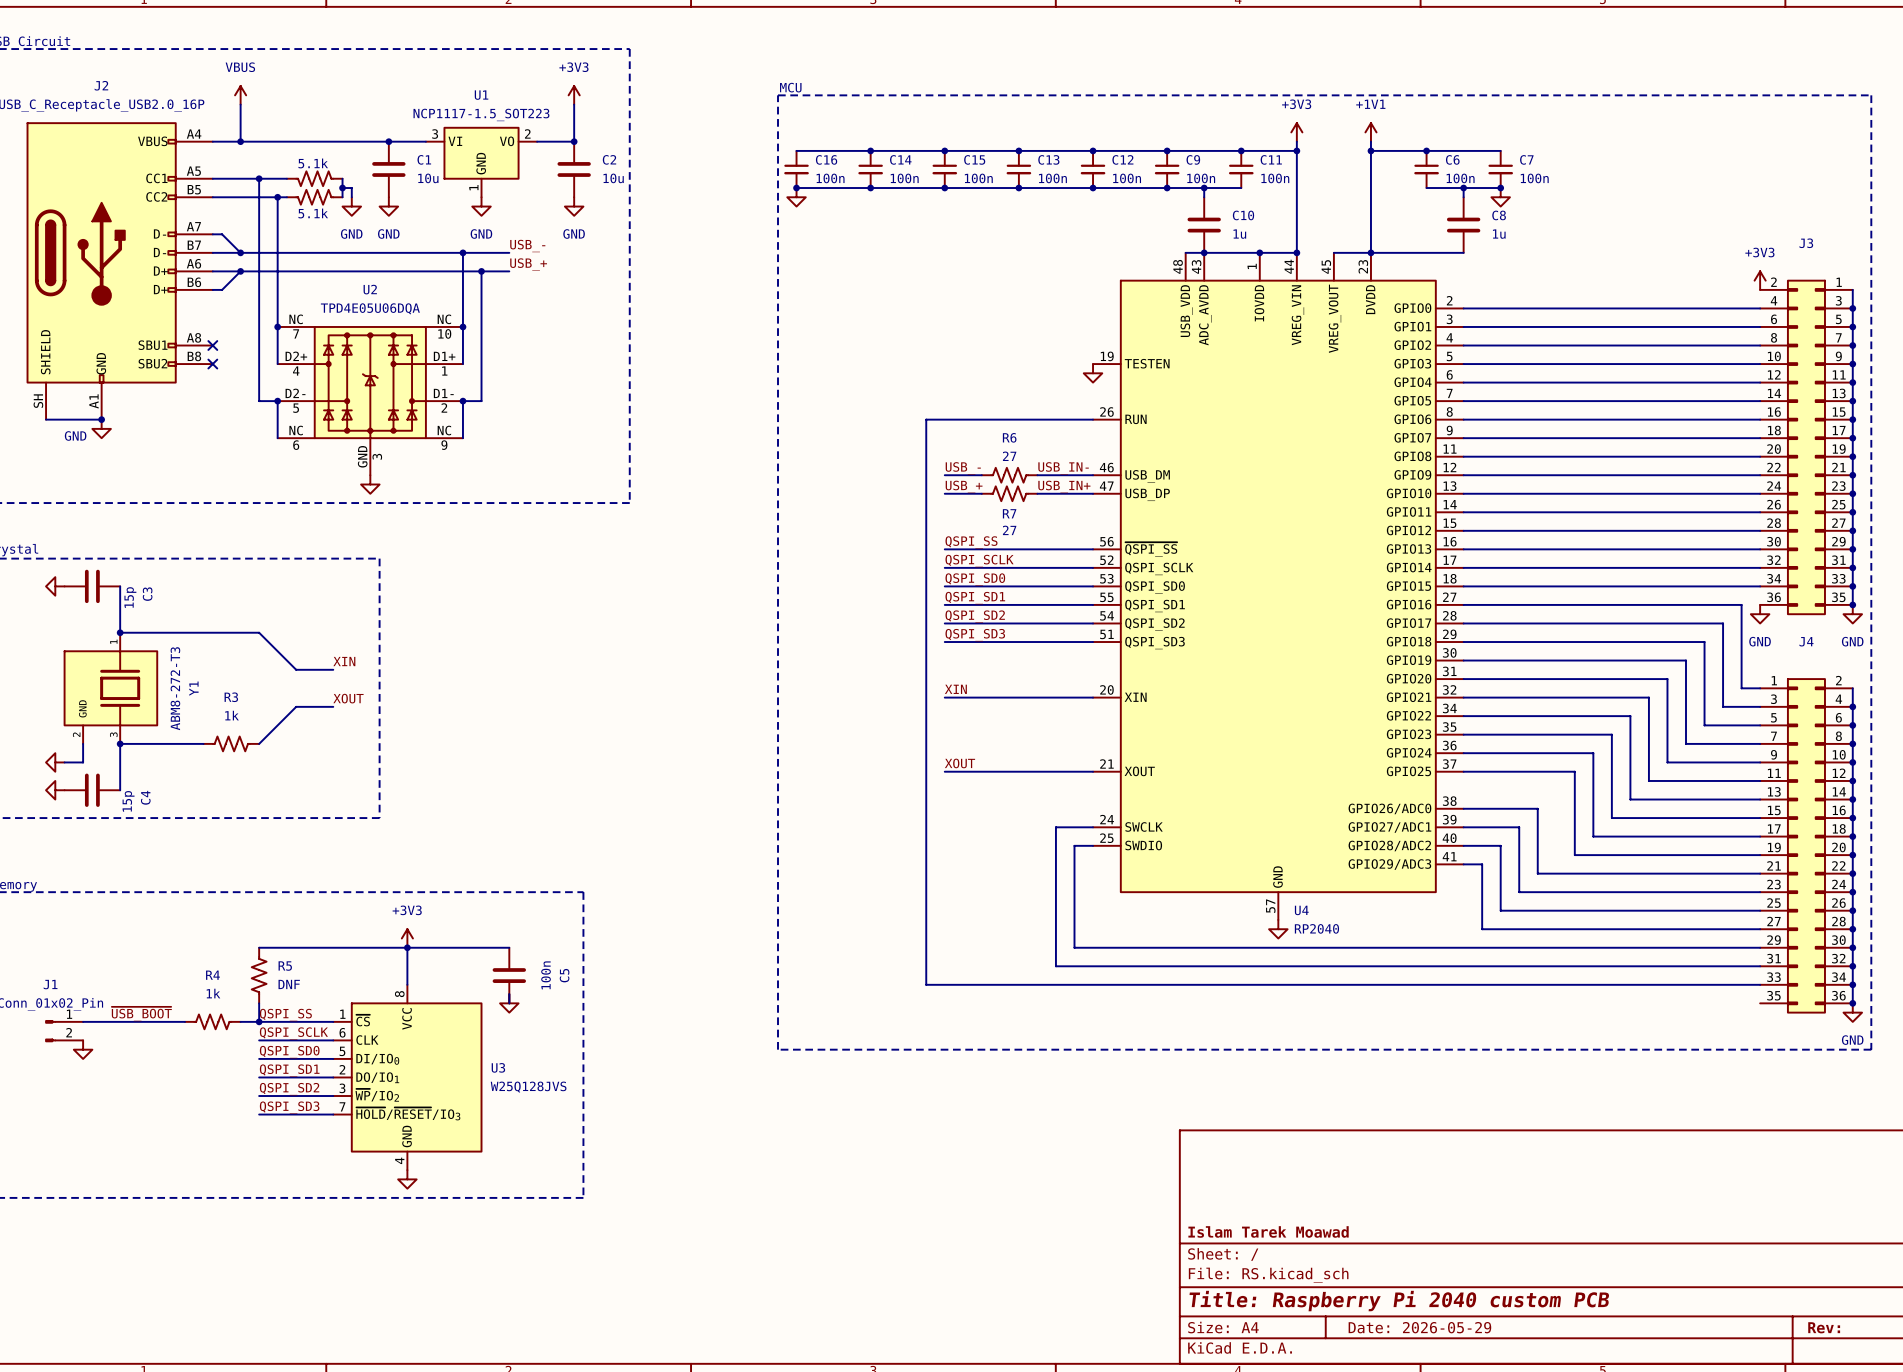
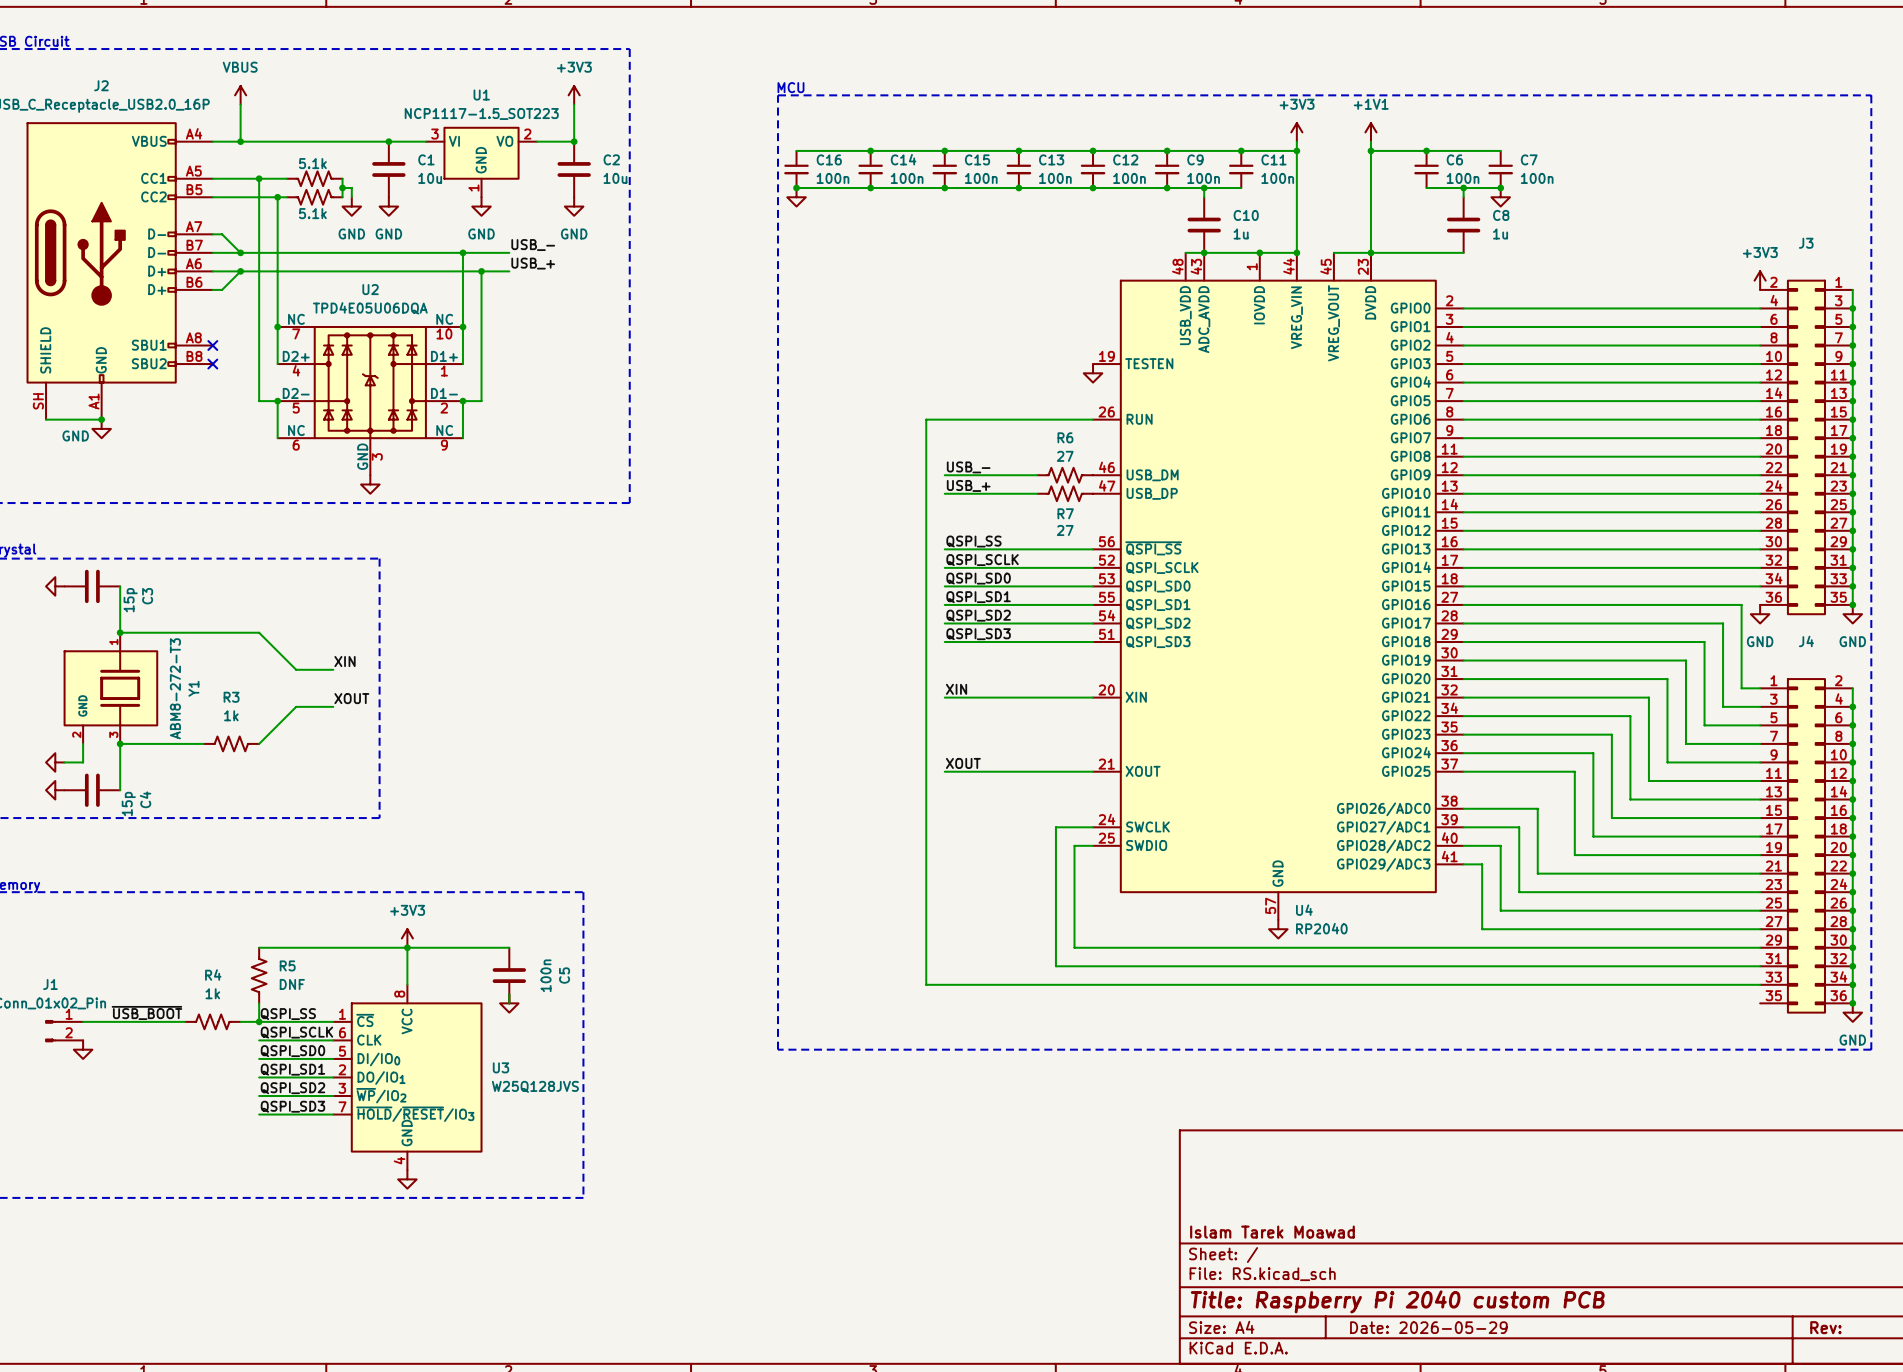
label: USB_IN- (1063, 468) -> none
R6 position: (1009, 475) -> (1065, 475)
label: USB_IN+ (1064, 486) -> none
R7 position: (1009, 493) -> (1065, 493)

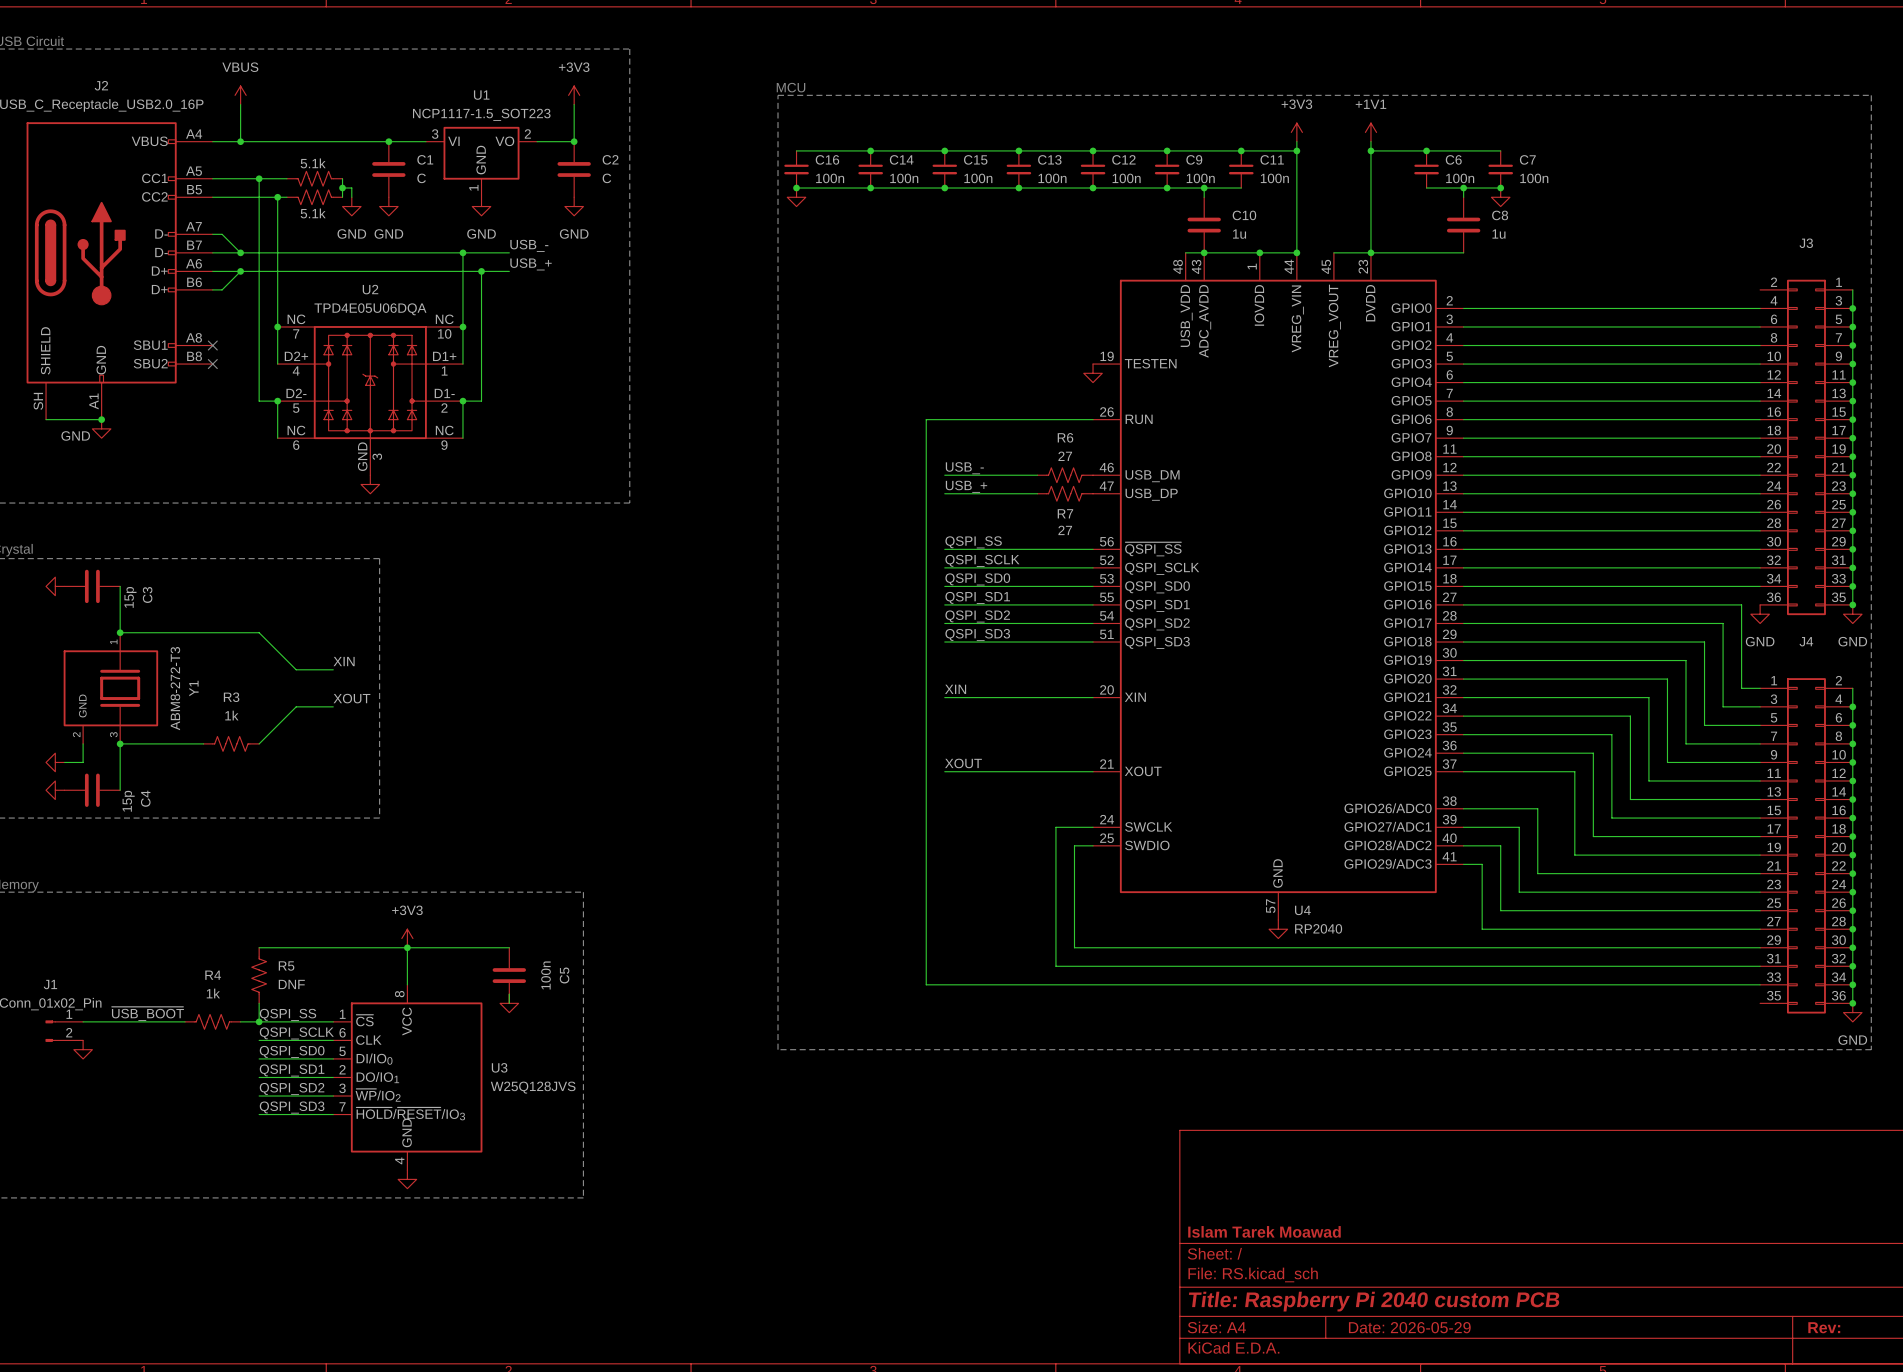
C1 value: 10u (430, 178) -> C (421, 178)
C2 value: 10u (615, 178) -> C (606, 178)
power symbol: +3V3 (1760, 280) -> none

